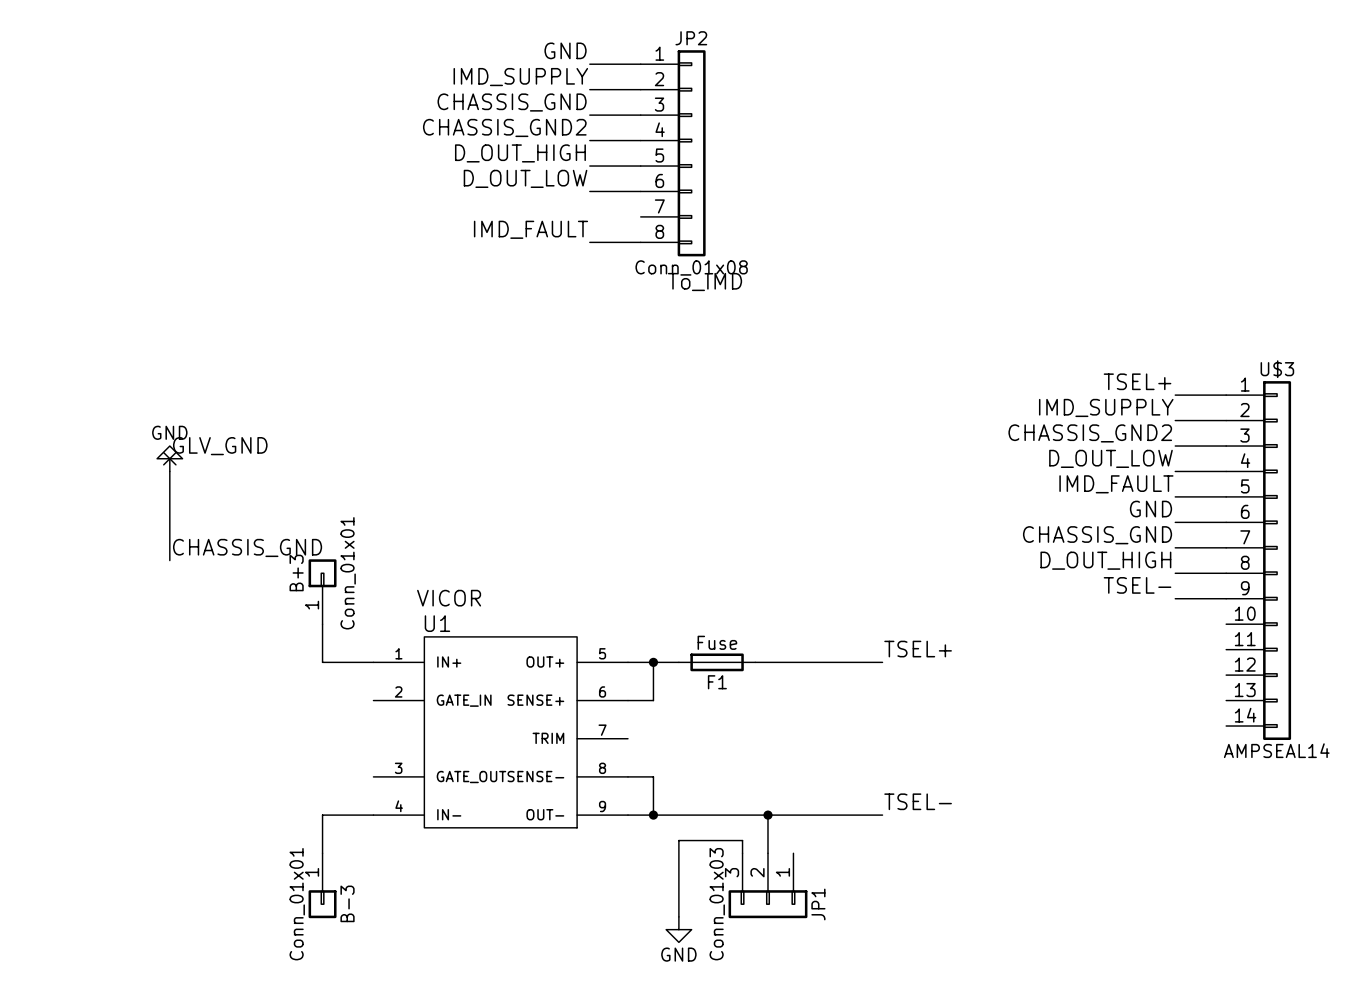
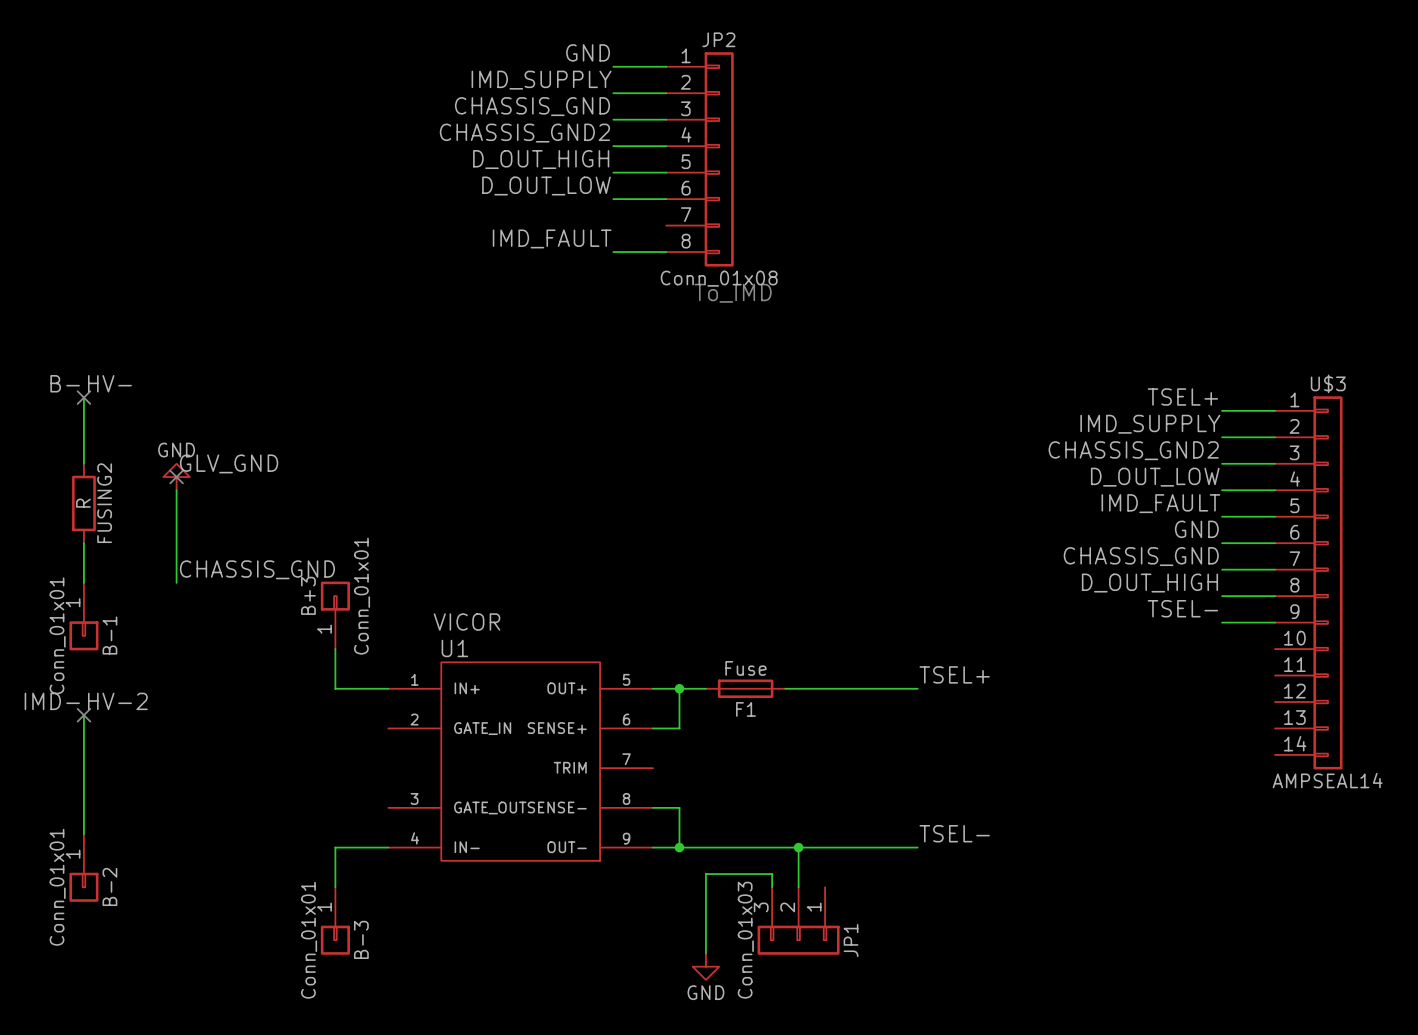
label: none -> B- (65, 383)
label: none -> HV- (109, 383)
wire: none -> (83, 397) (83, 463)
no-connect mark: none -> (83, 397)
FUSING2: none -> R (83, 503)
wire: none -> (83, 543) (83, 582)
B-1: none -> Conn_01x01 (83, 616)
label: none -> IMD- (52, 701)
label: none -> HV-2 (117, 701)
wire: none -> (83, 715) (83, 834)
no-connect mark: none -> (83, 715)
B-2: none -> Conn_01x01 (83, 868)

